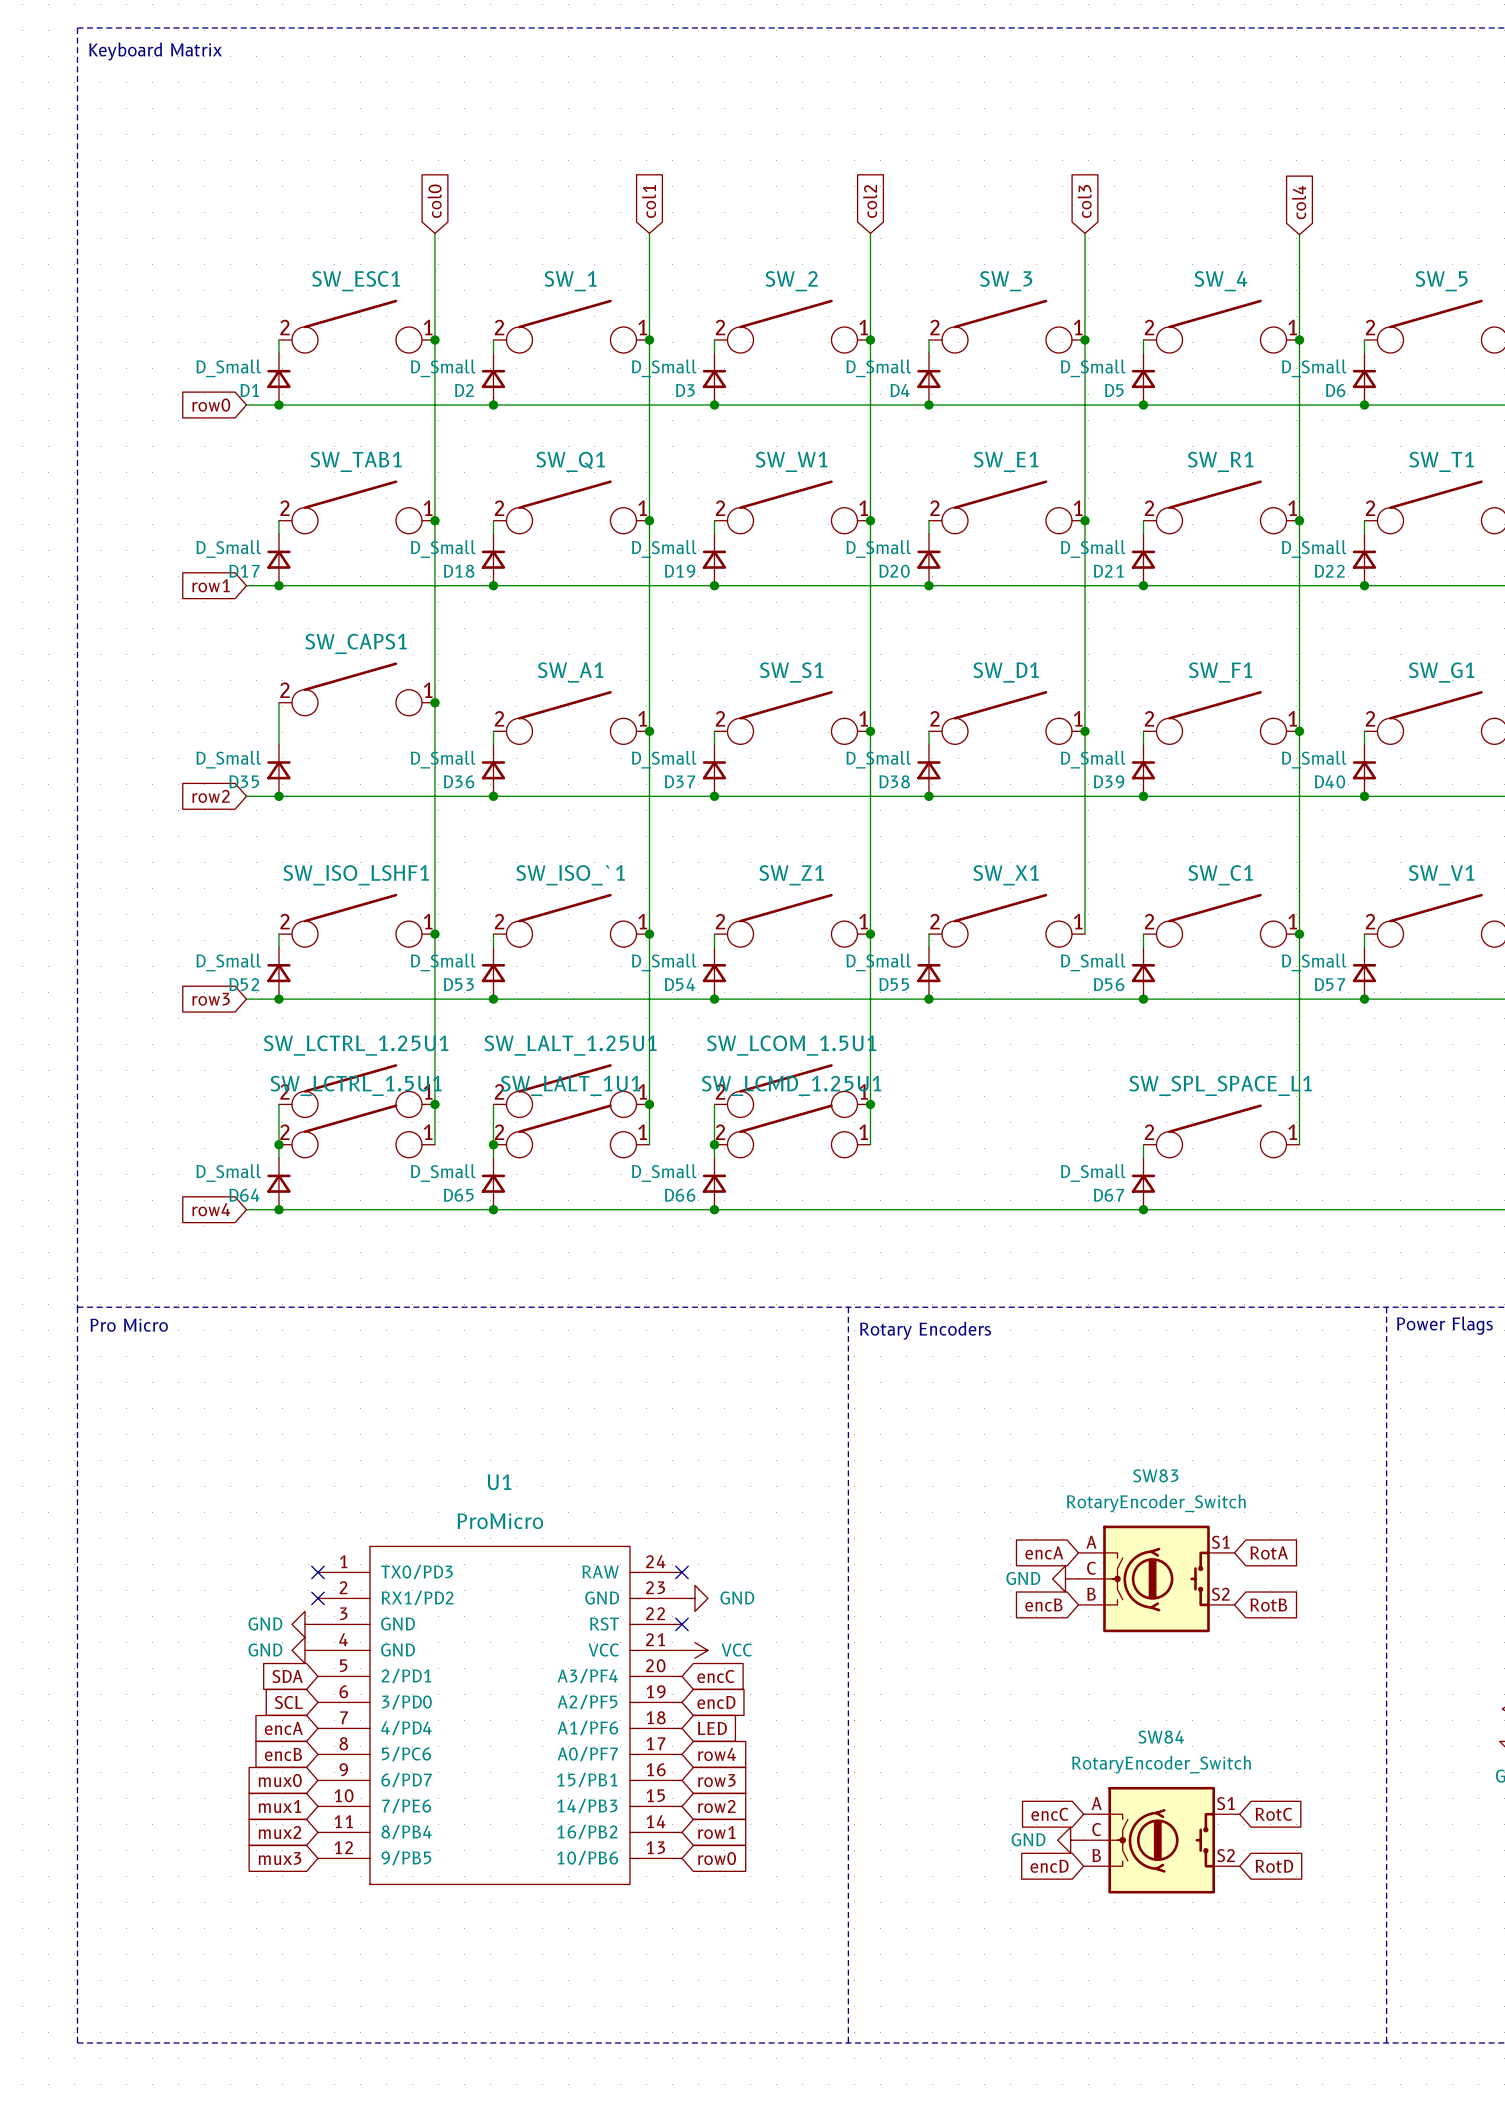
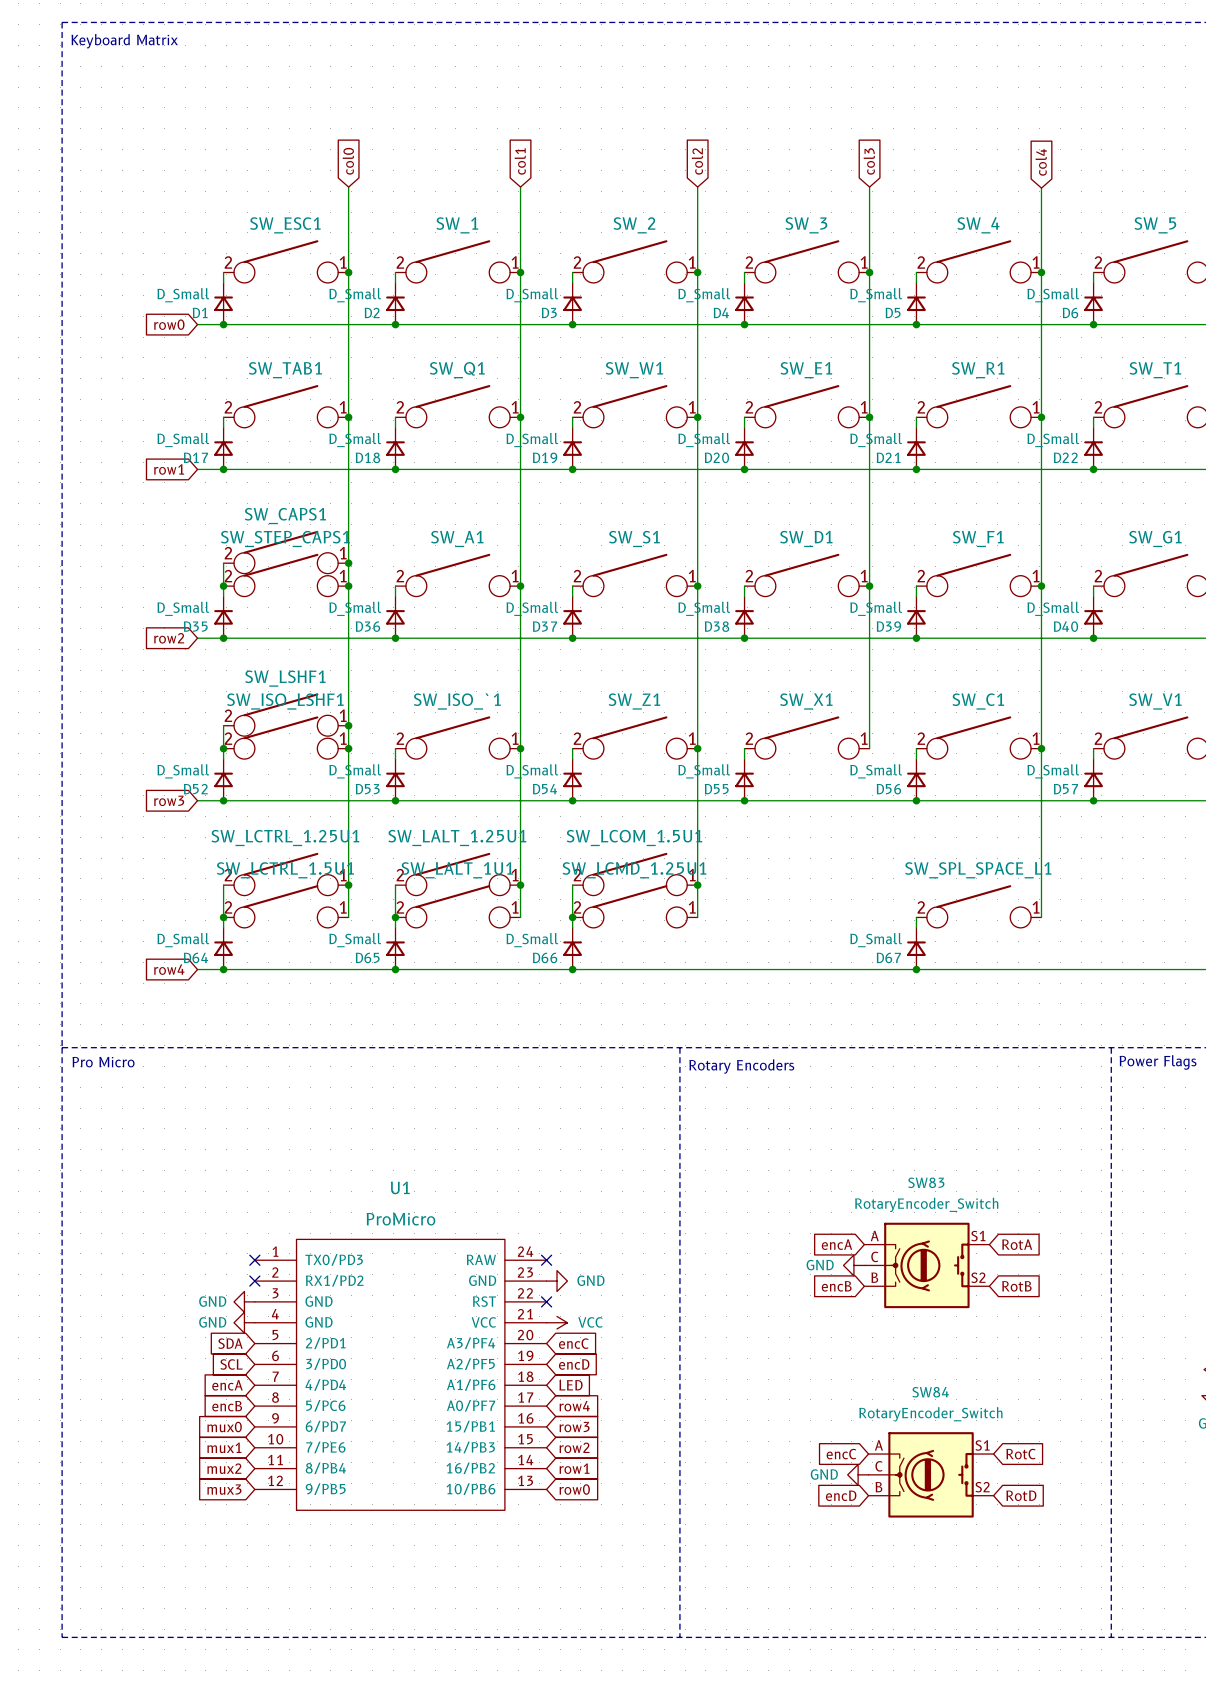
SW_STEP_CAPS1: none -> (286, 575)
junction: none -> (223, 586)
junction: none -> (348, 586)
SW_LSHF1: none -> (286, 714)
wire: none -> (223, 725) (223, 748)
junction: none -> (348, 725)
junction: none -> (223, 748)

